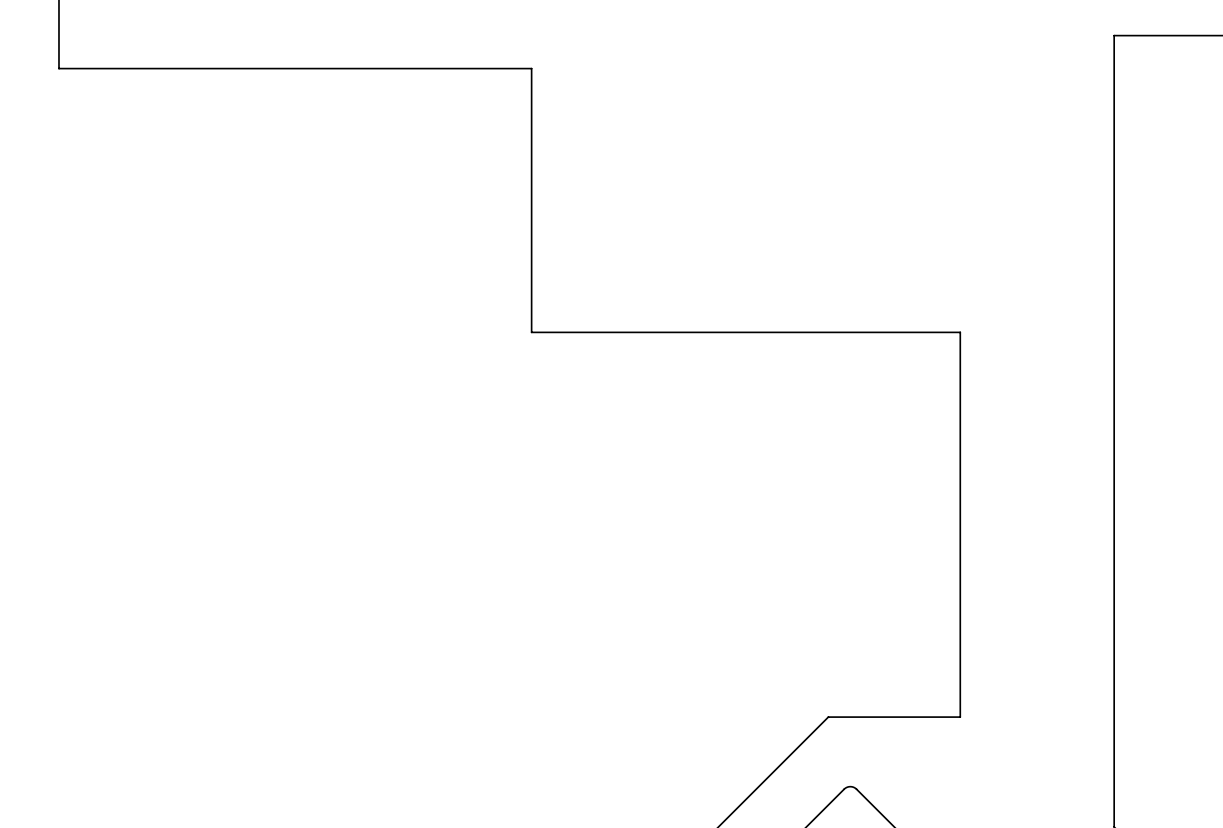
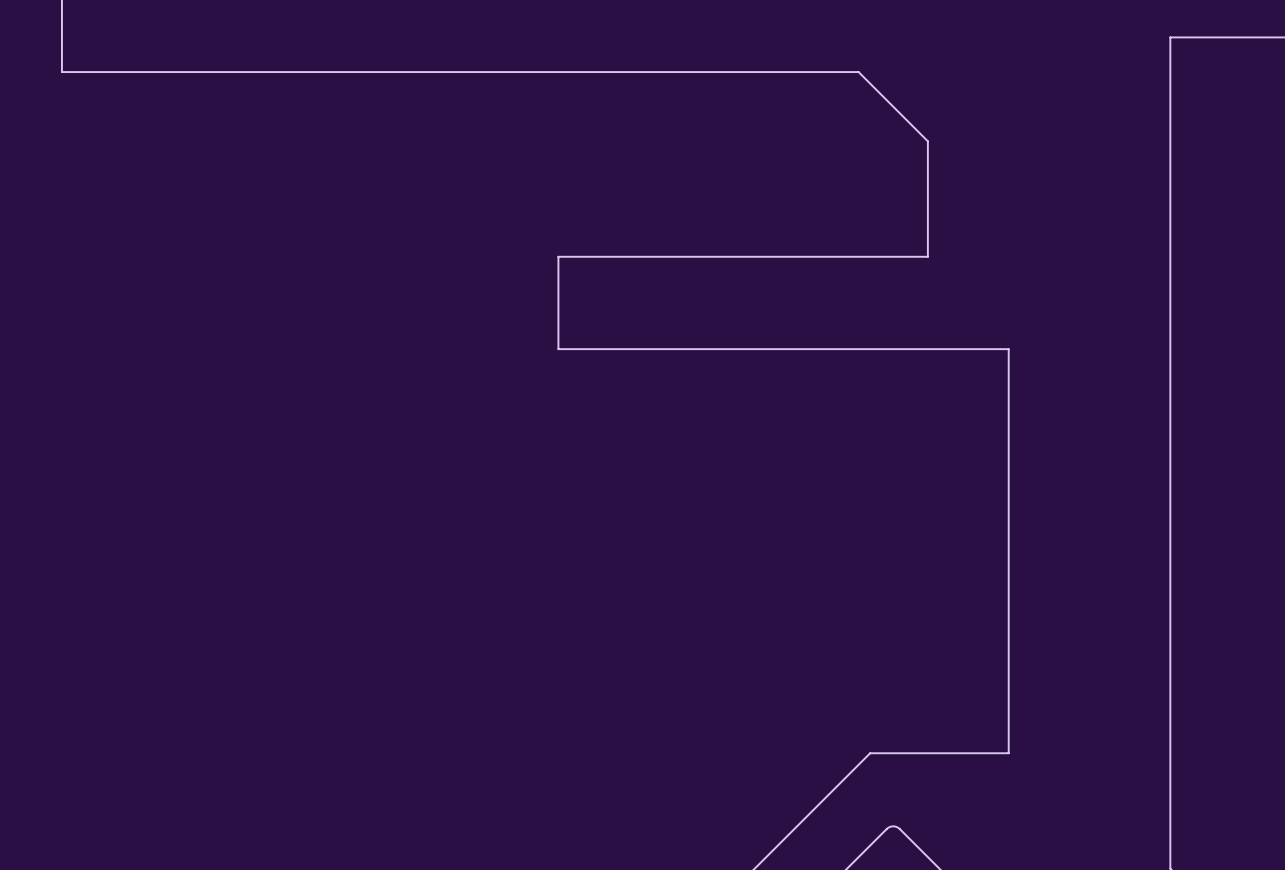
board edge: (531, 68) (531, 244) -> (558, 72) (858, 72) (927, 141) (927, 256) (558, 256)

